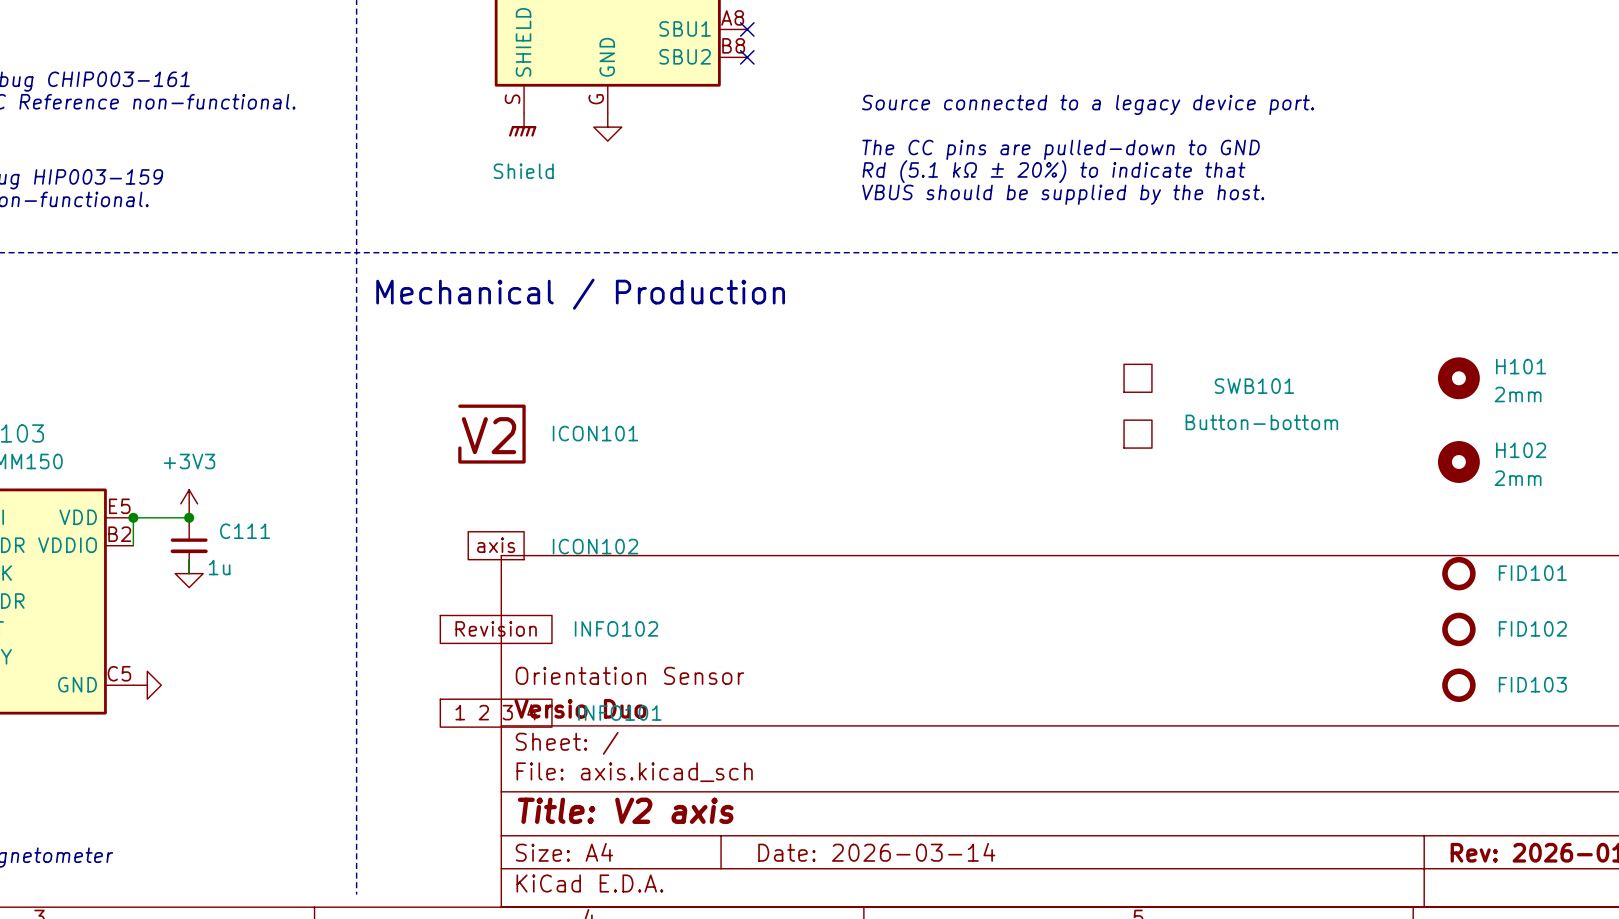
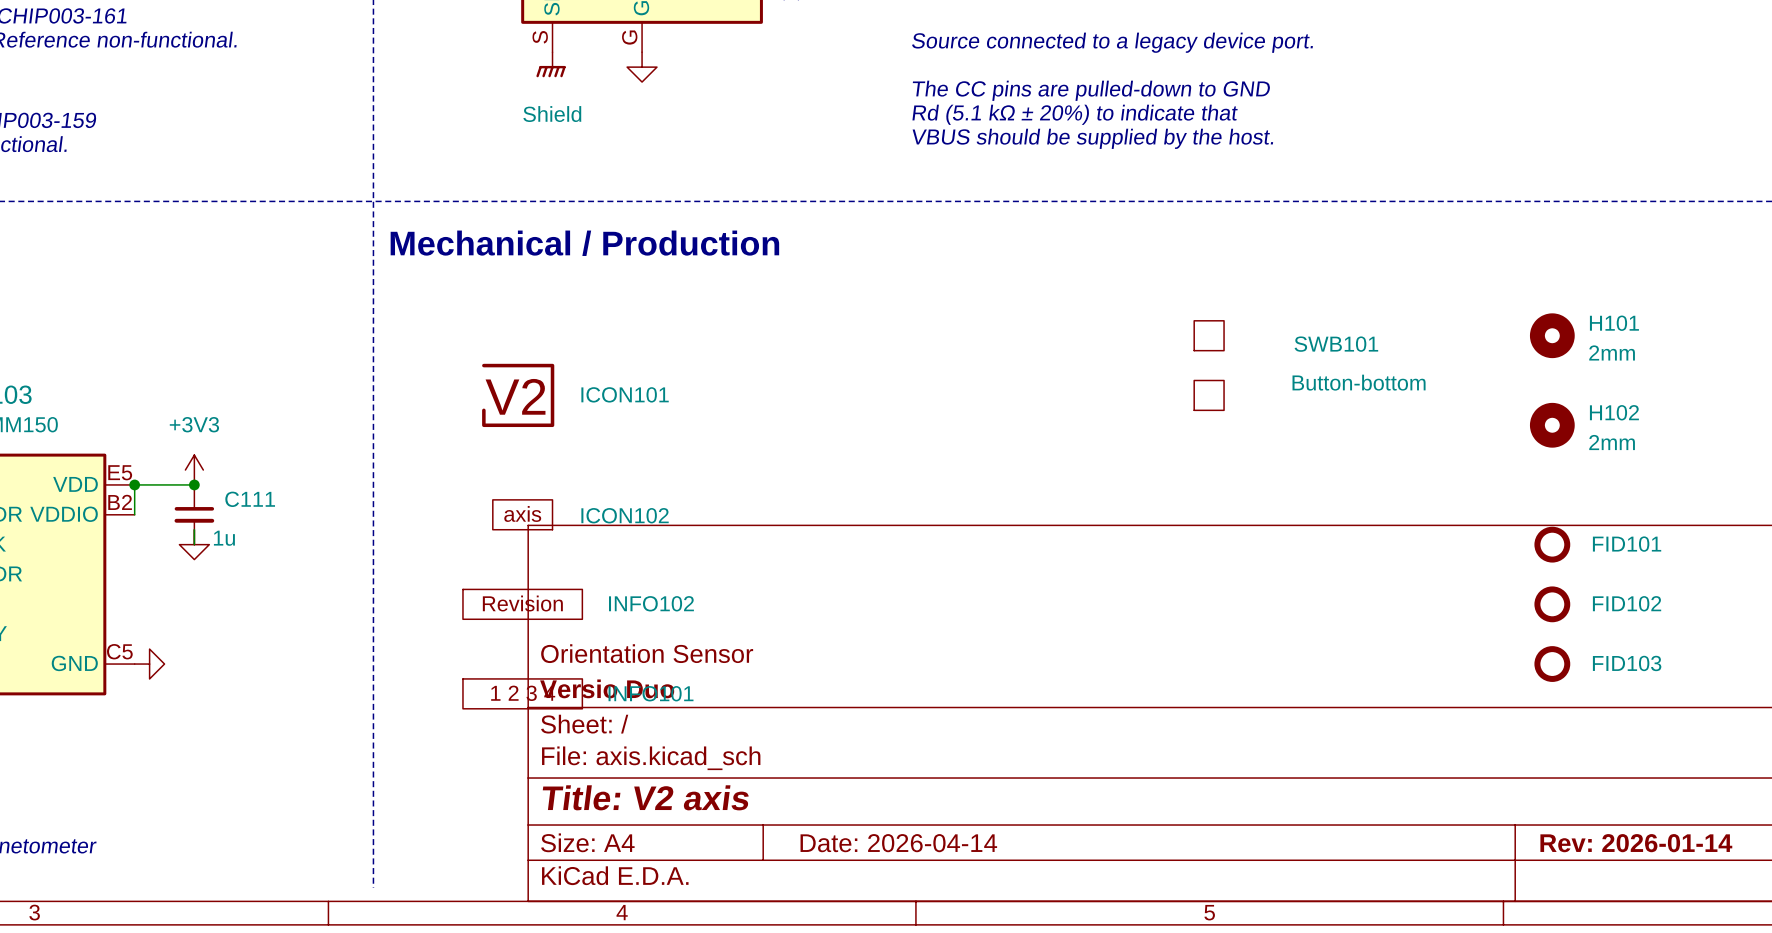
title block: Date: 2026-03-14 (876, 852) -> Date: 2026-04-14 (898, 843)

